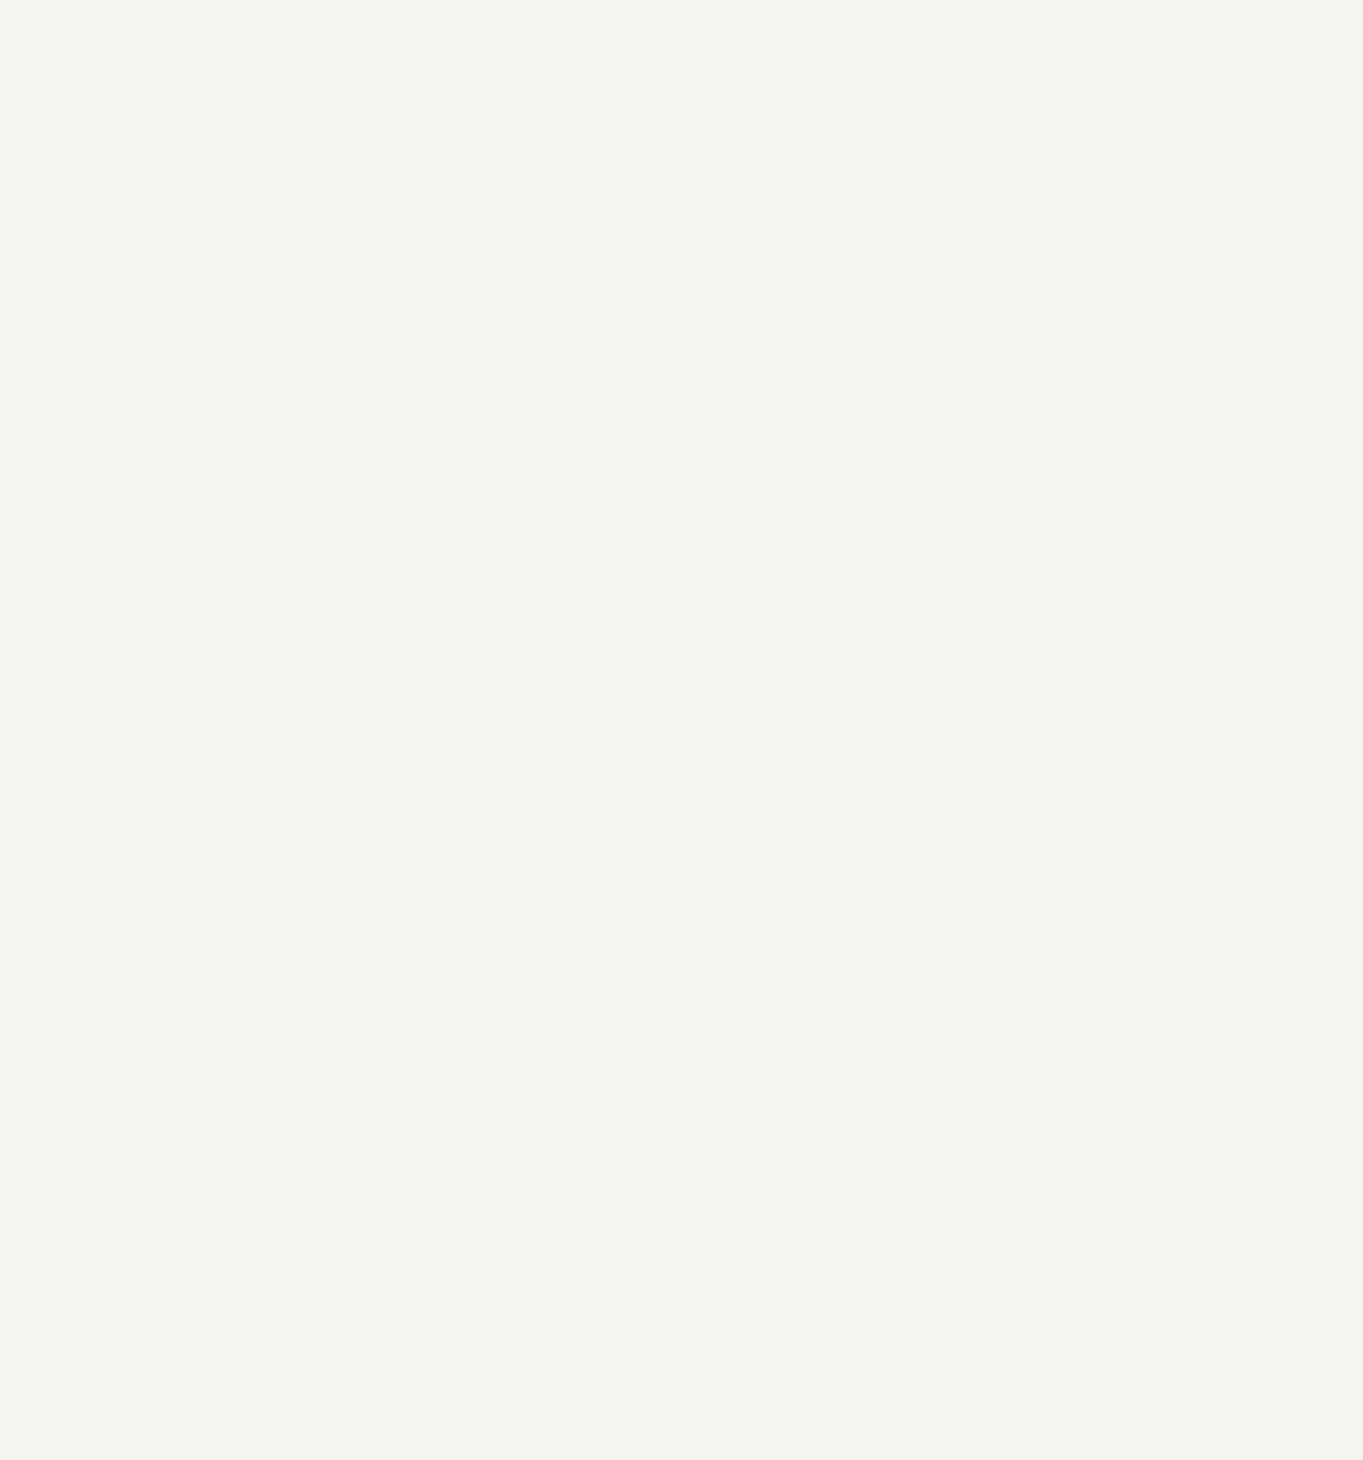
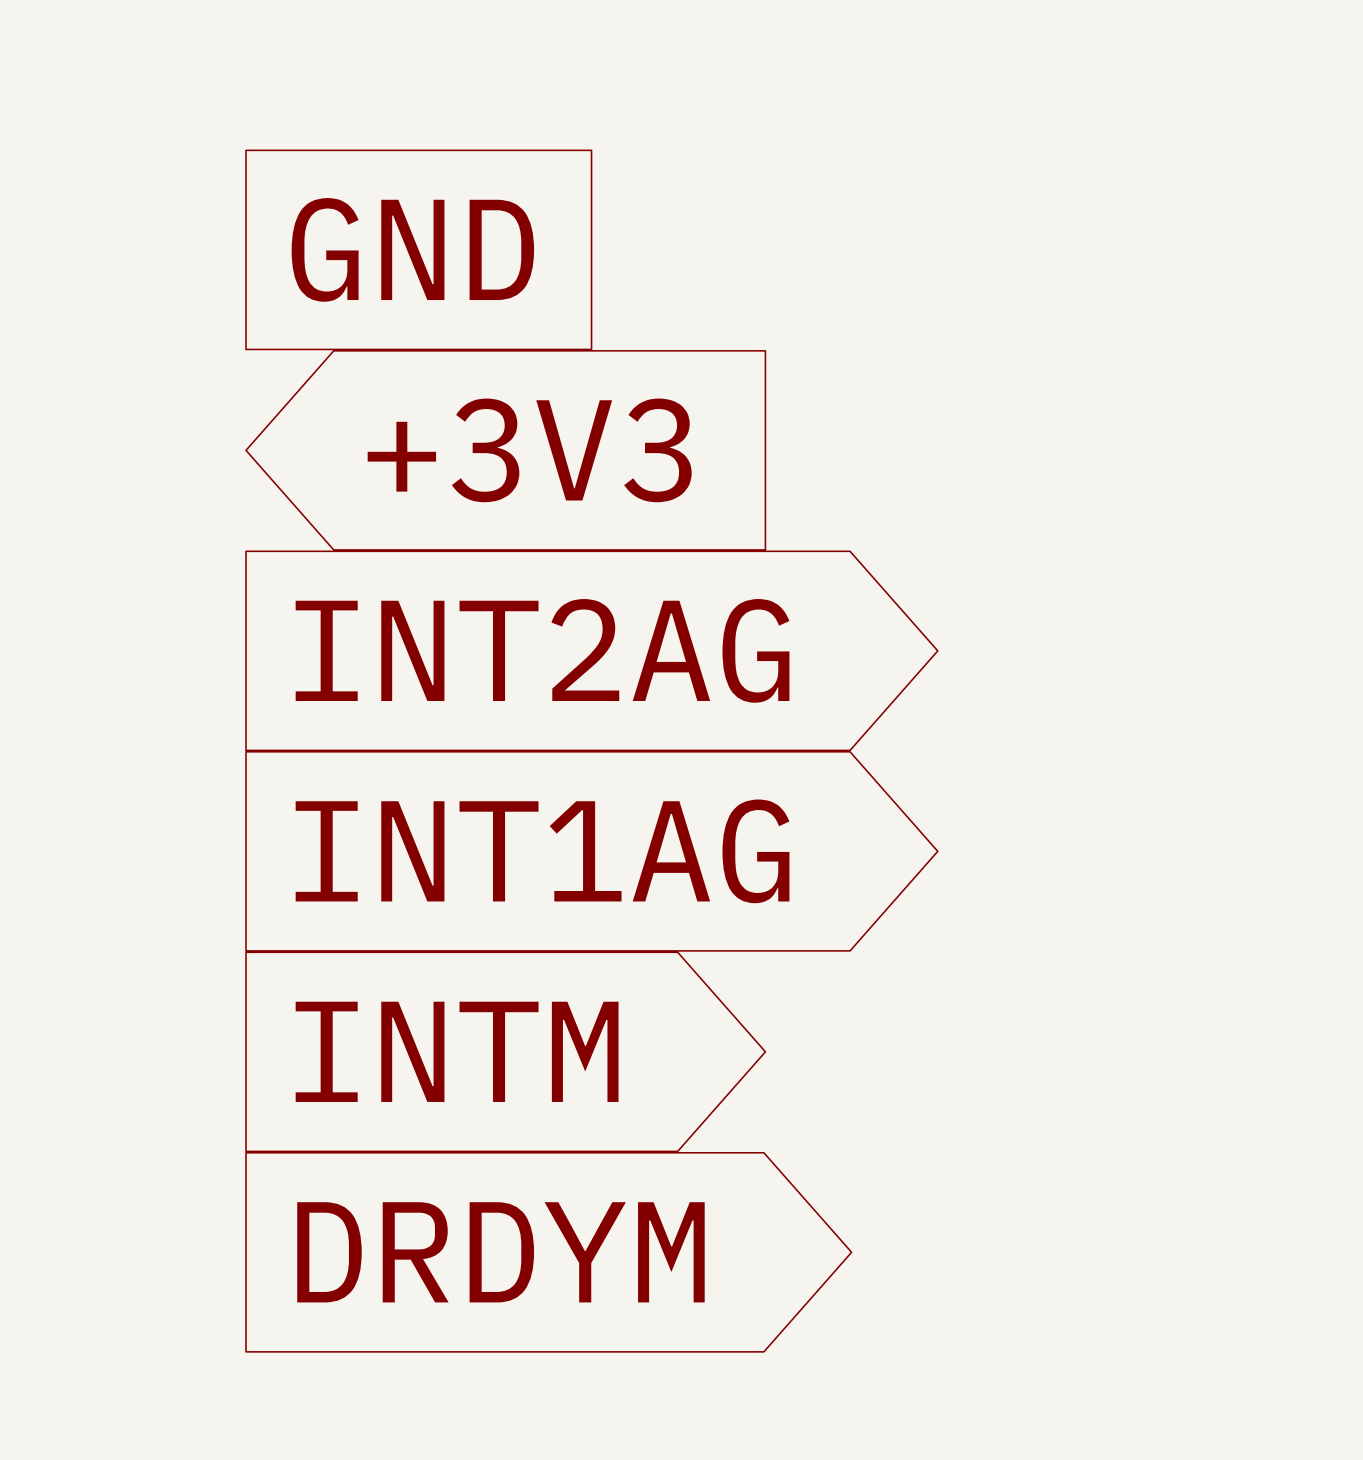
global label: none -> GND (412, 249)
global label: none -> +3V3 (529, 450)
global label: none -> INT2AG (542, 650)
global label: none -> INT1AG (542, 851)
global label: none -> INTM (457, 1051)
global label: none -> DRDYM (500, 1252)

